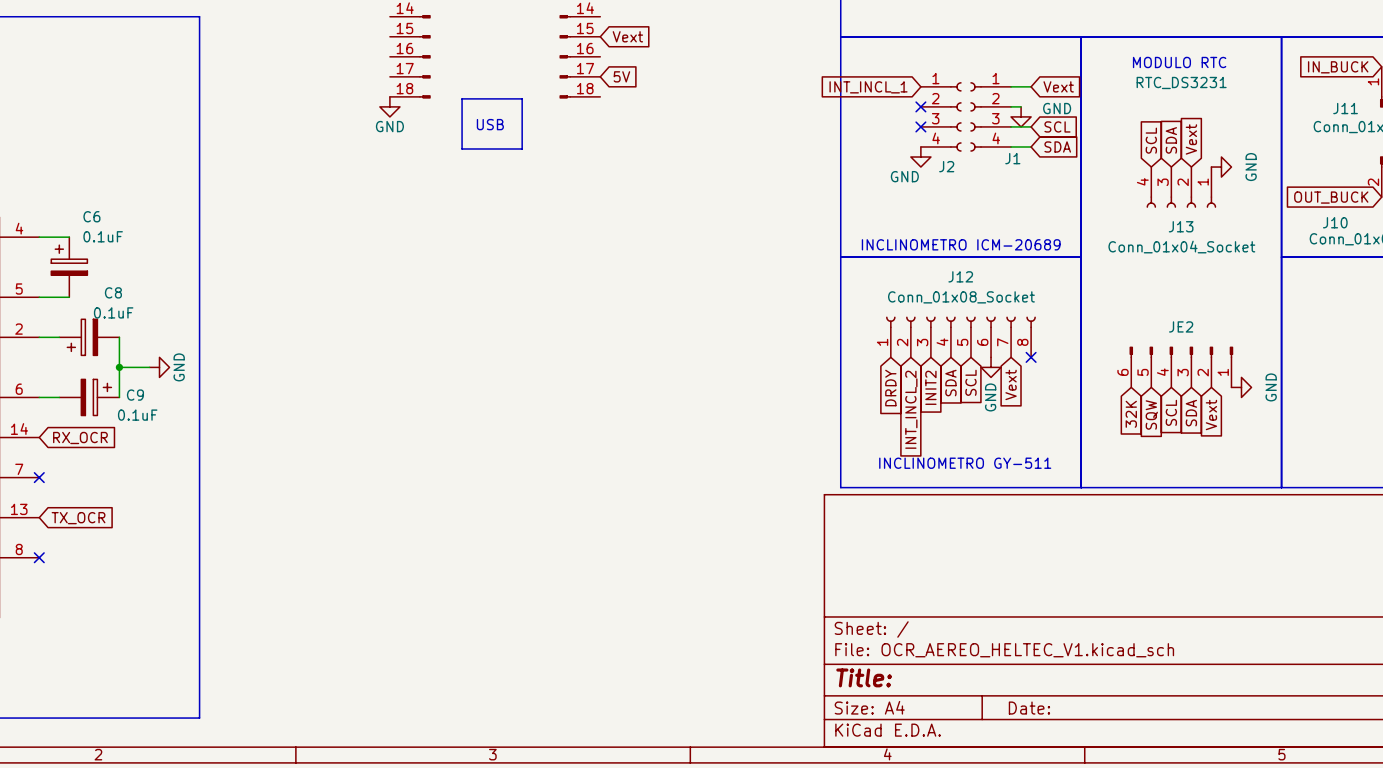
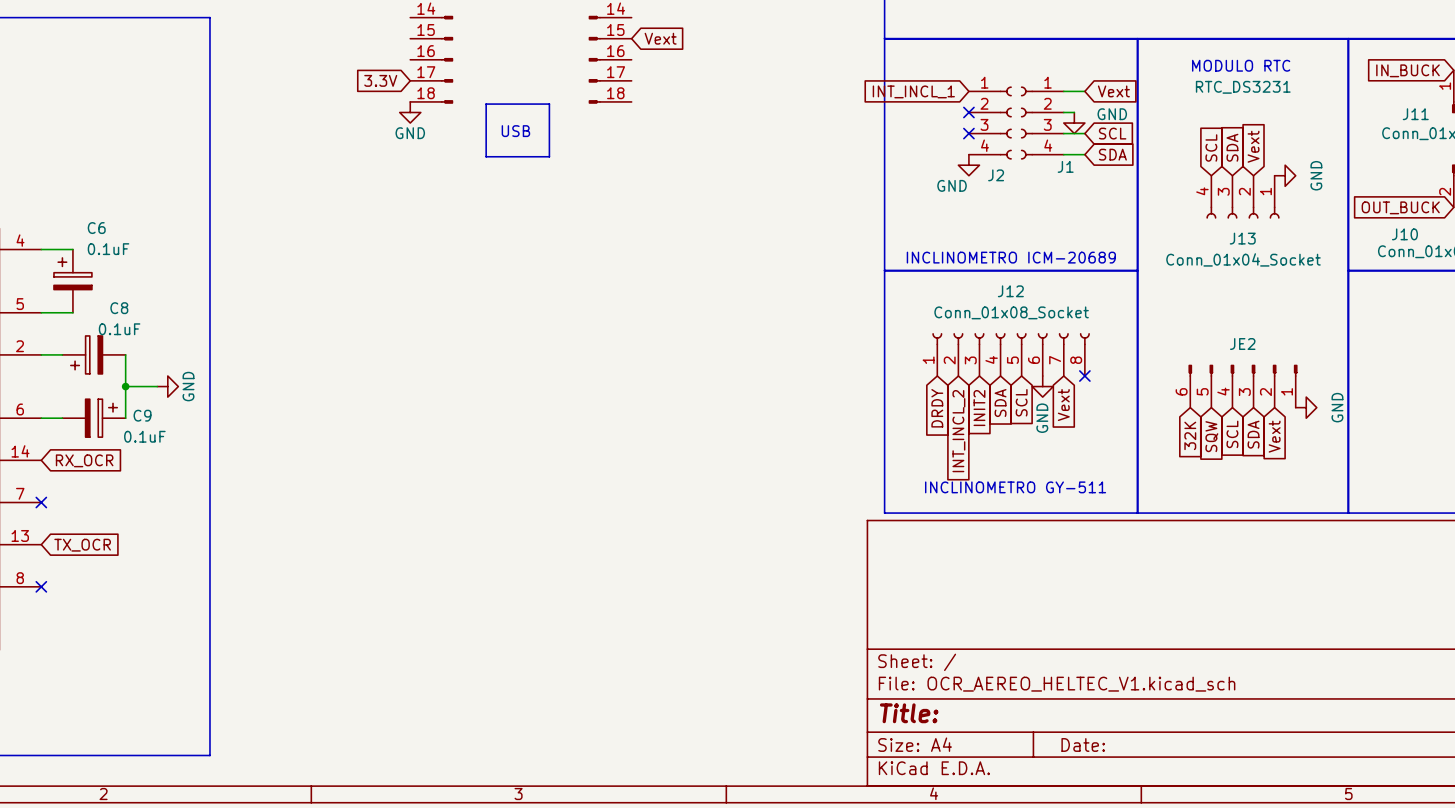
global label: none -> 3.3V (380, 80)
global label: 5V (621, 76) -> none

